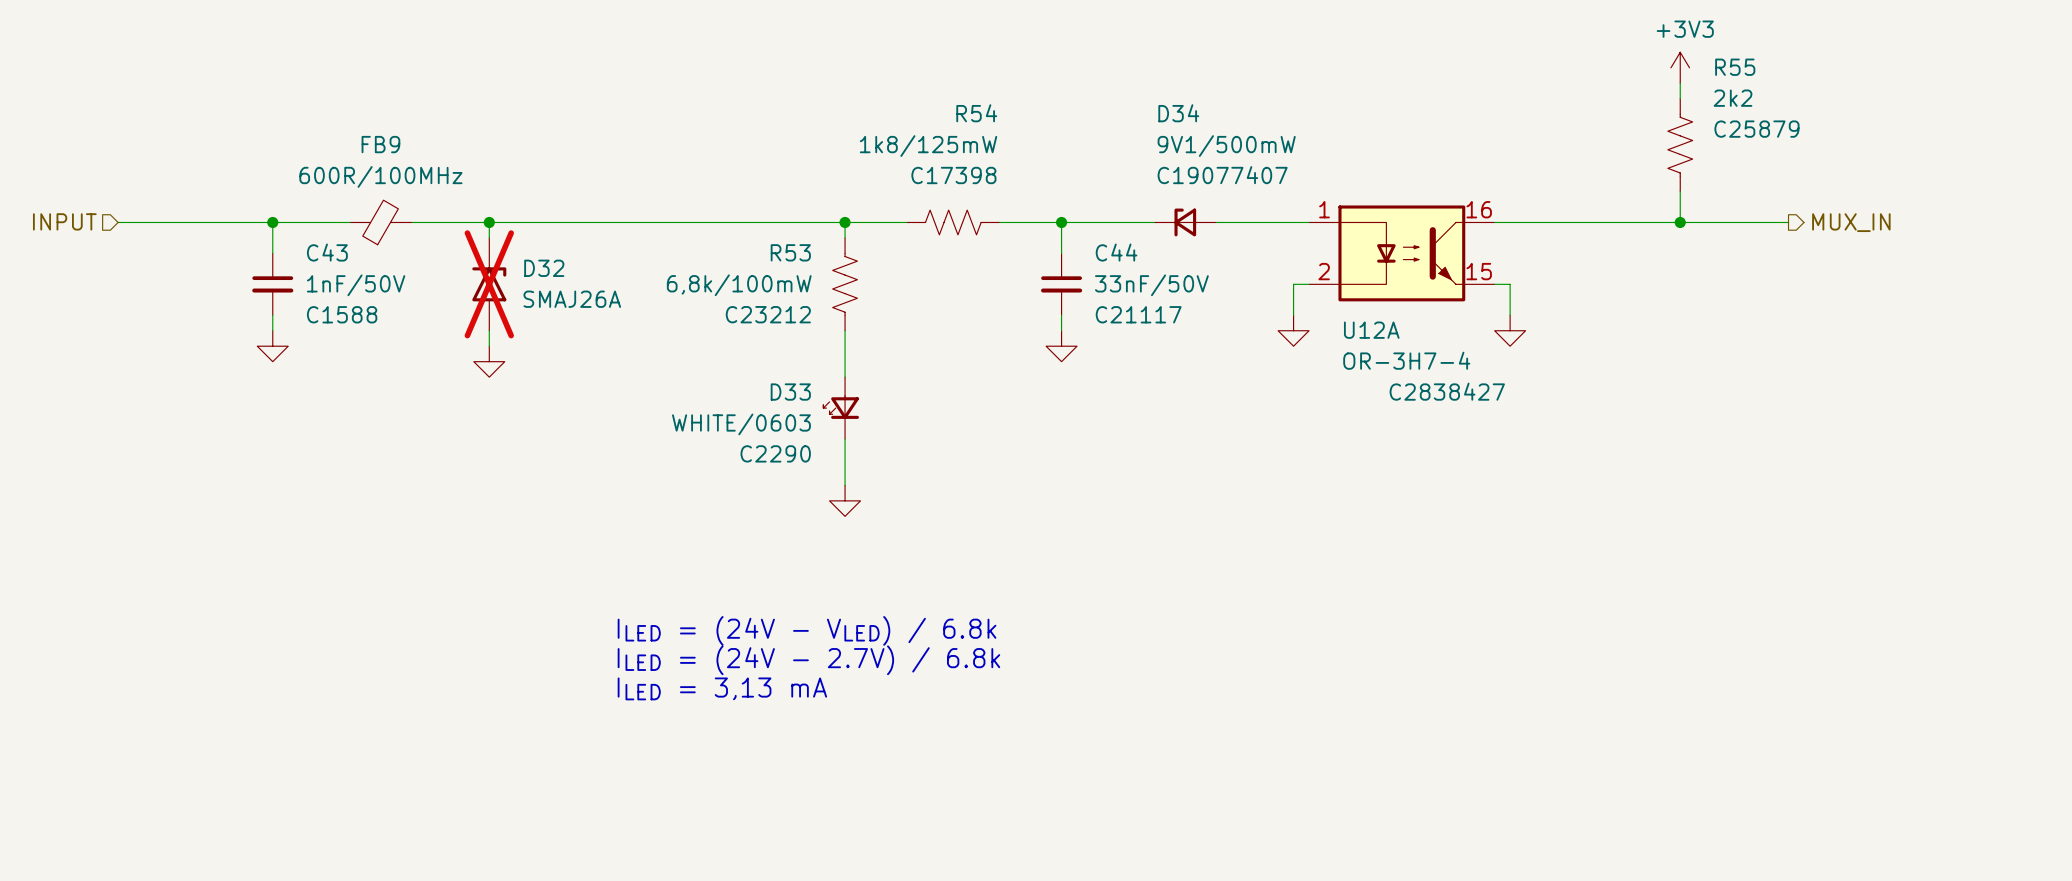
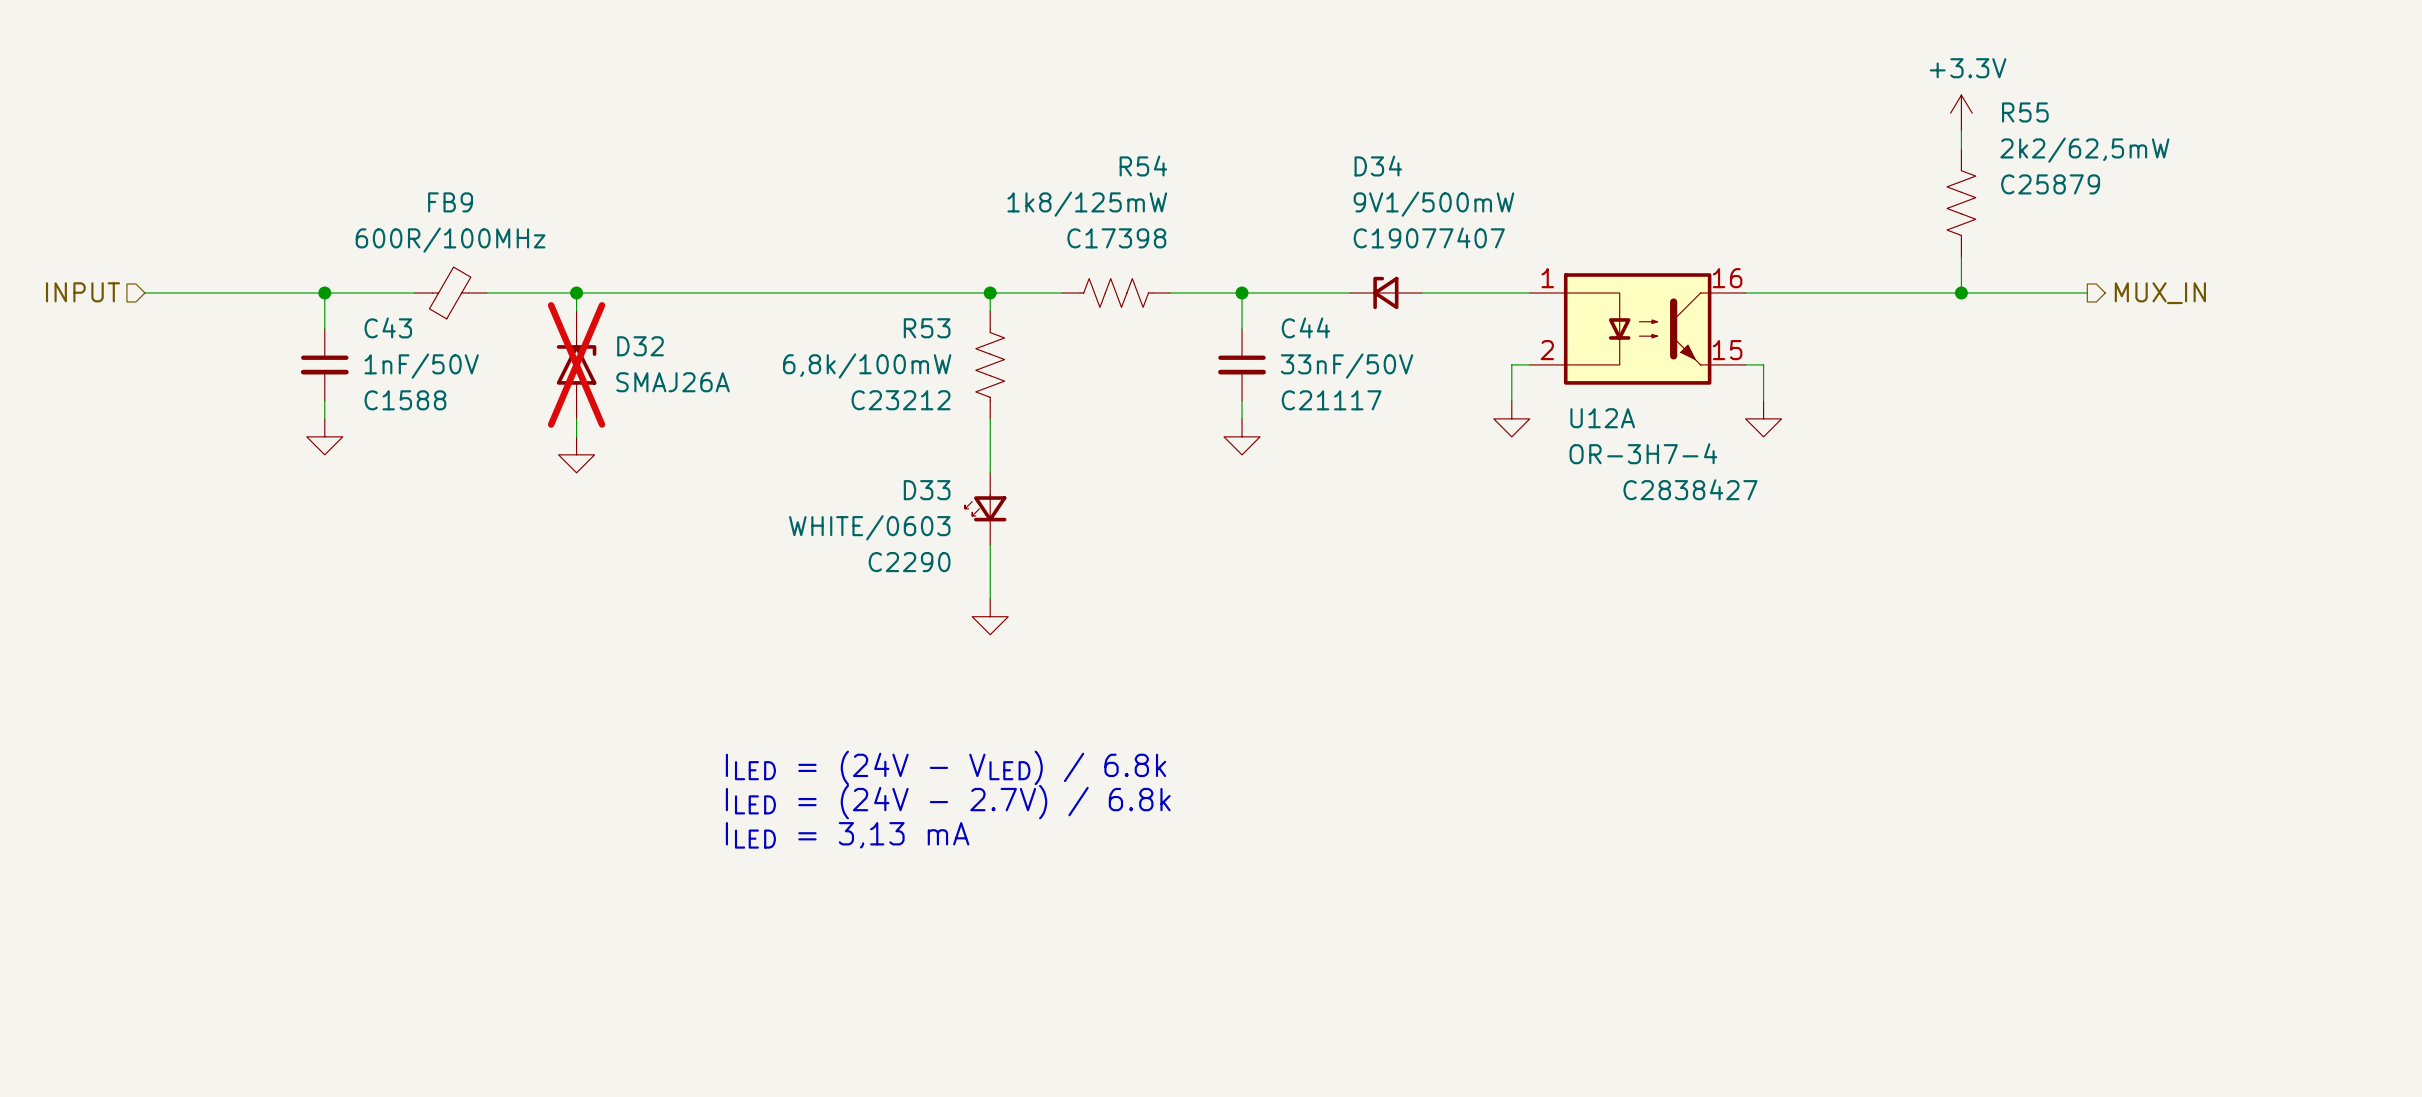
power symbol: +3V3 (1680, 67) -> +3.3V (1961, 113)
R55 value: 2k2 (1733, 98) -> 2k2/62,5mW (2084, 150)

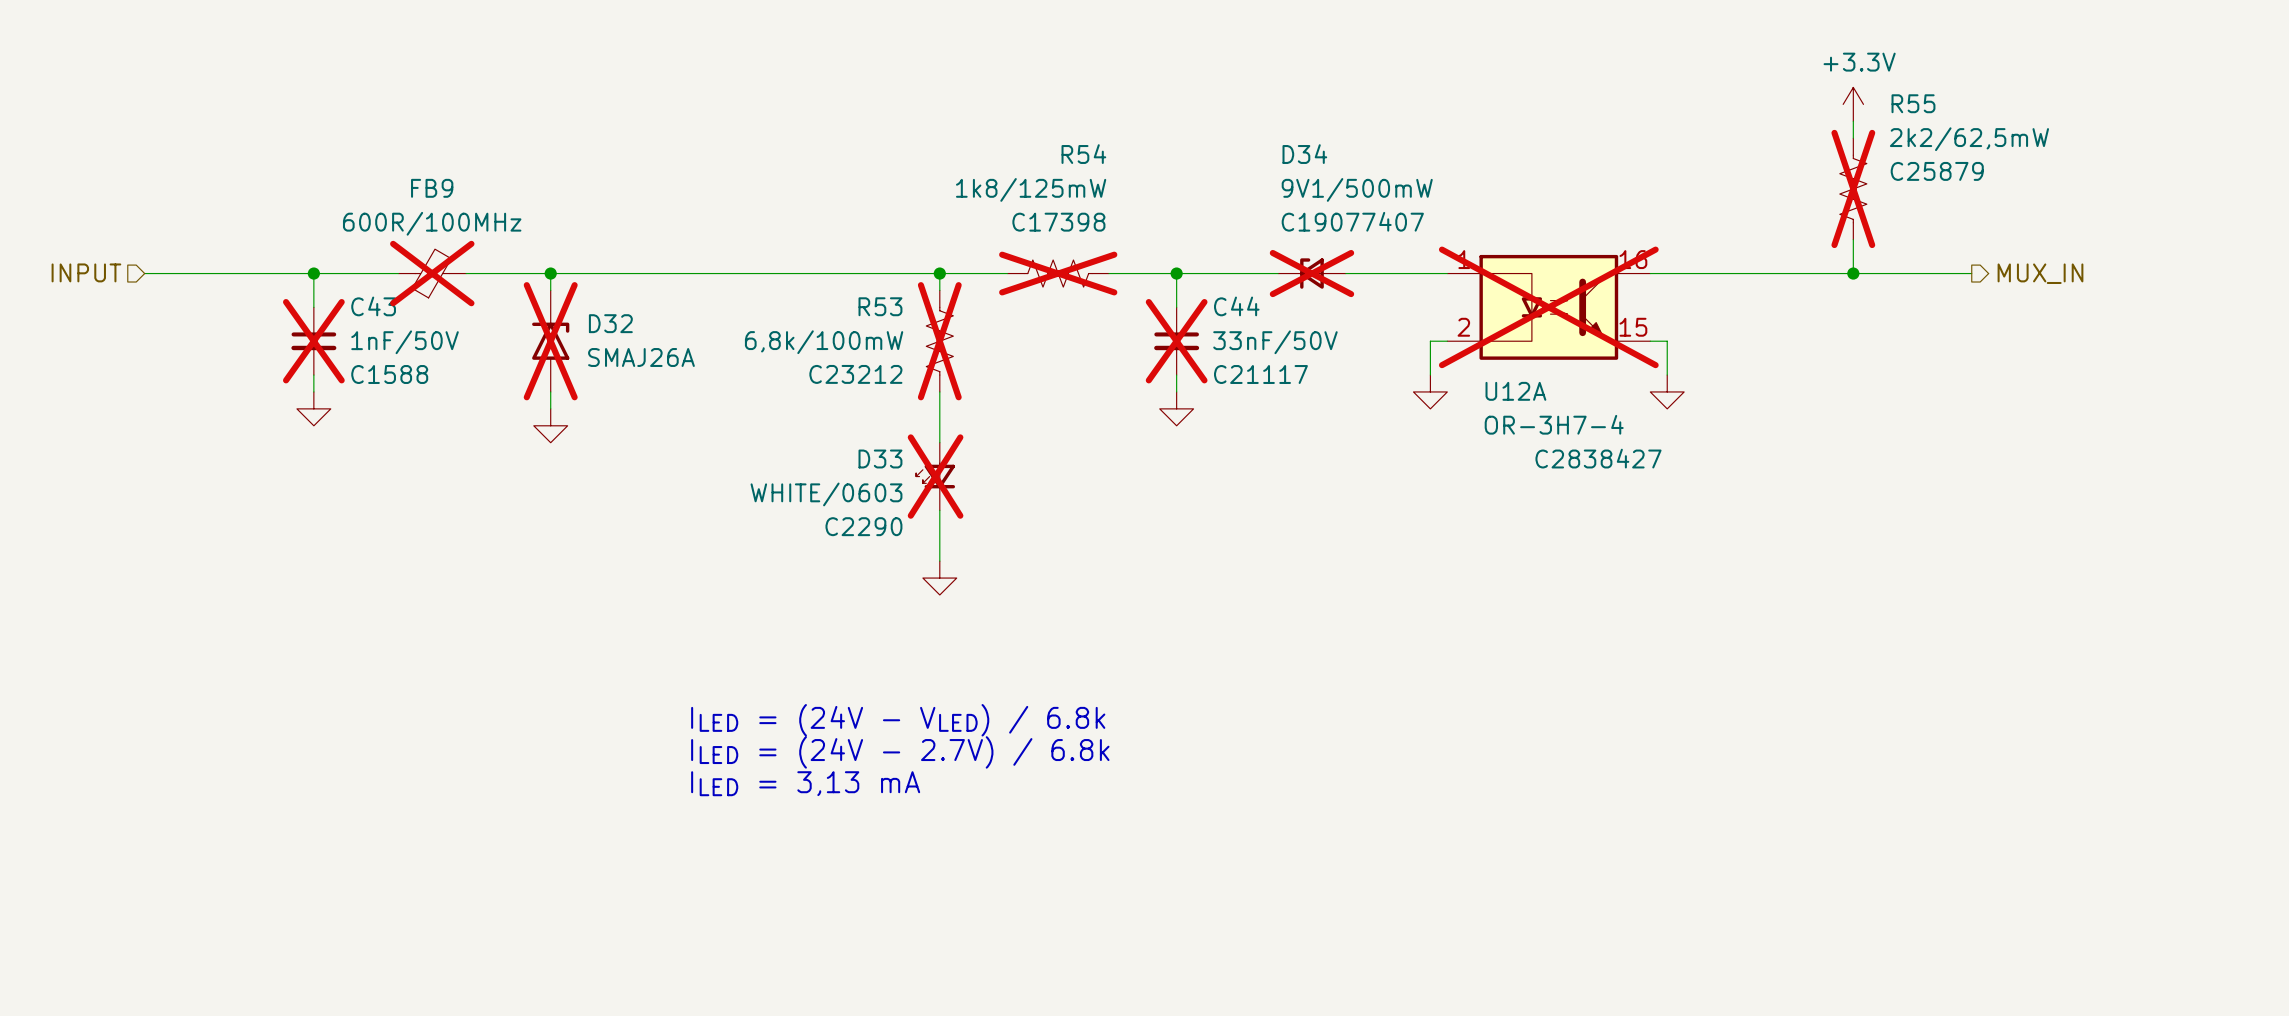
R55 do-not-place cross: none -> (1853, 188)
FB9 do-not-place cross: none -> (432, 273)
R54 do-not-place cross: none -> (1058, 273)
D34 do-not-place cross: none -> (1311, 273)
U12A do-not-place cross: none -> (1548, 307)
C43 do-not-place cross: none -> (313, 341)
R53 do-not-place cross: none -> (939, 341)
C44 do-not-place cross: none -> (1176, 341)
D33 do-not-place cross: none -> (935, 476)

